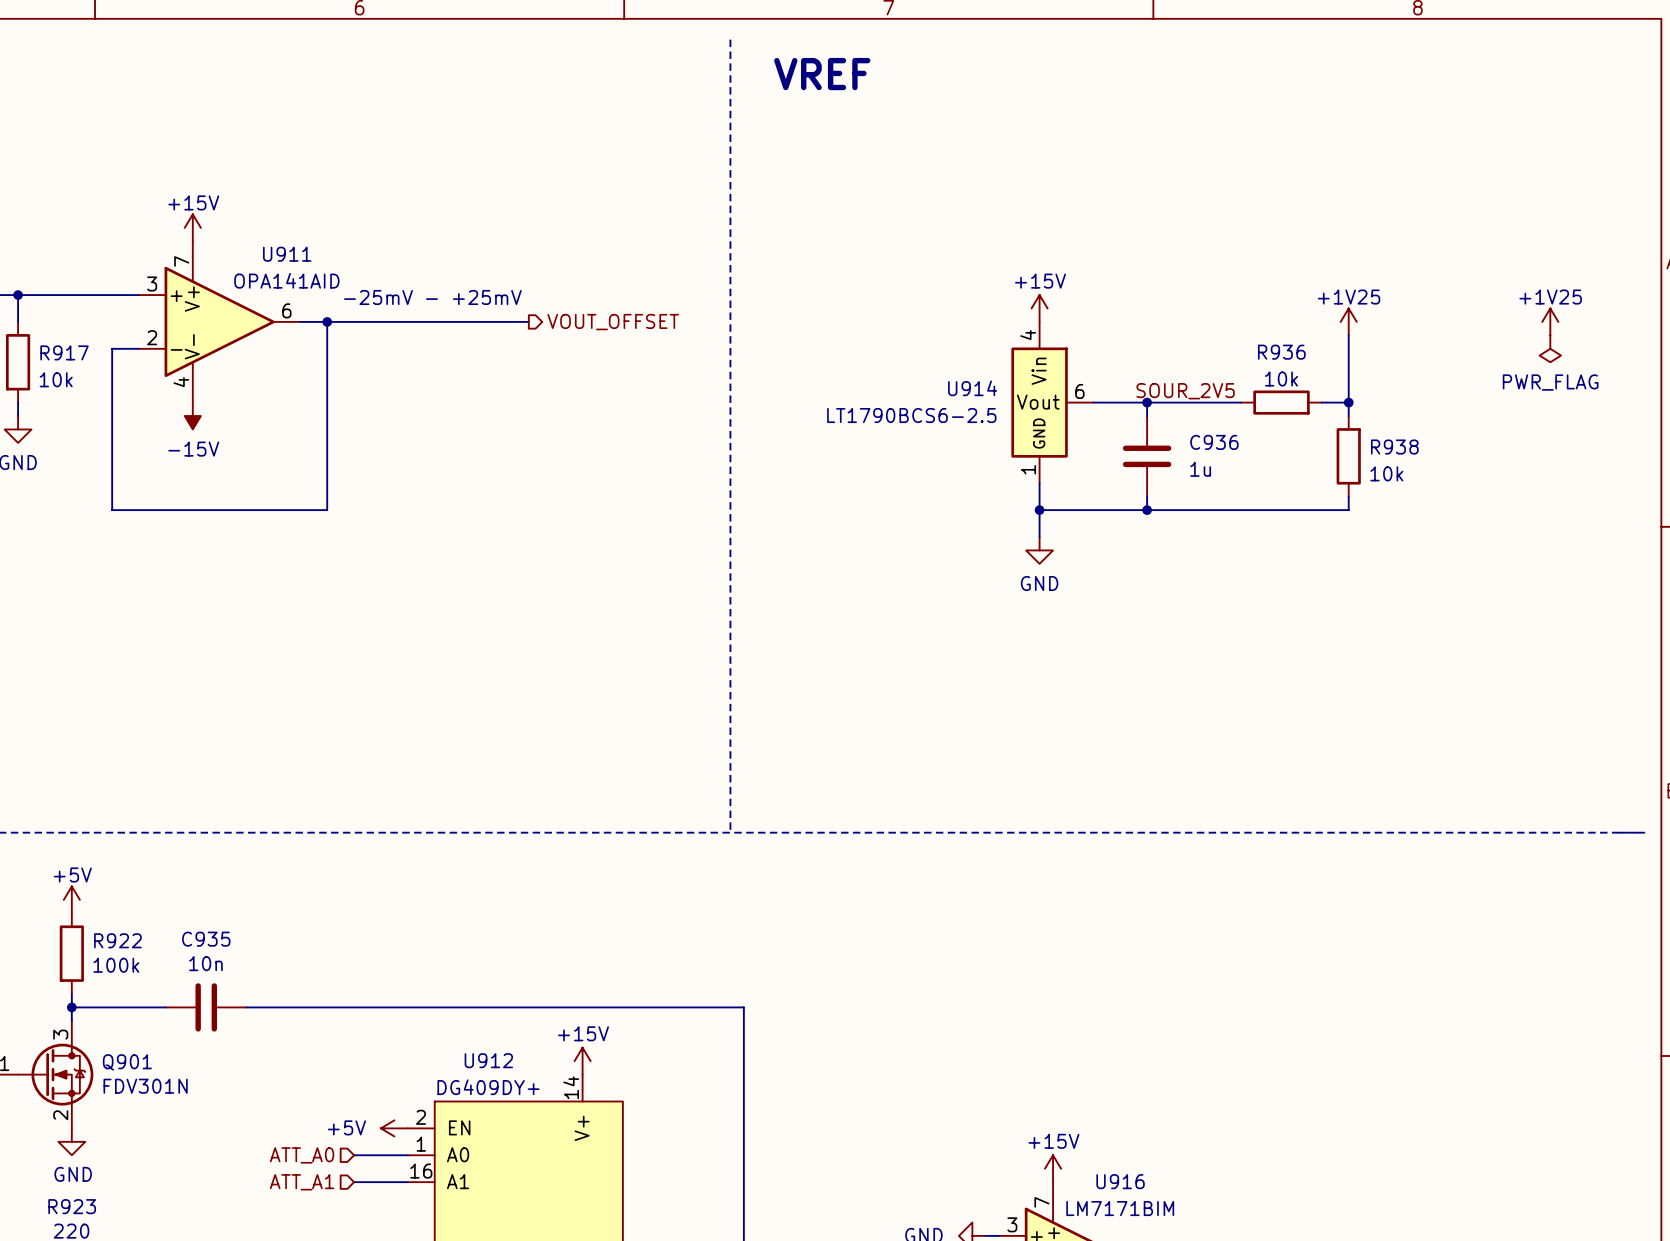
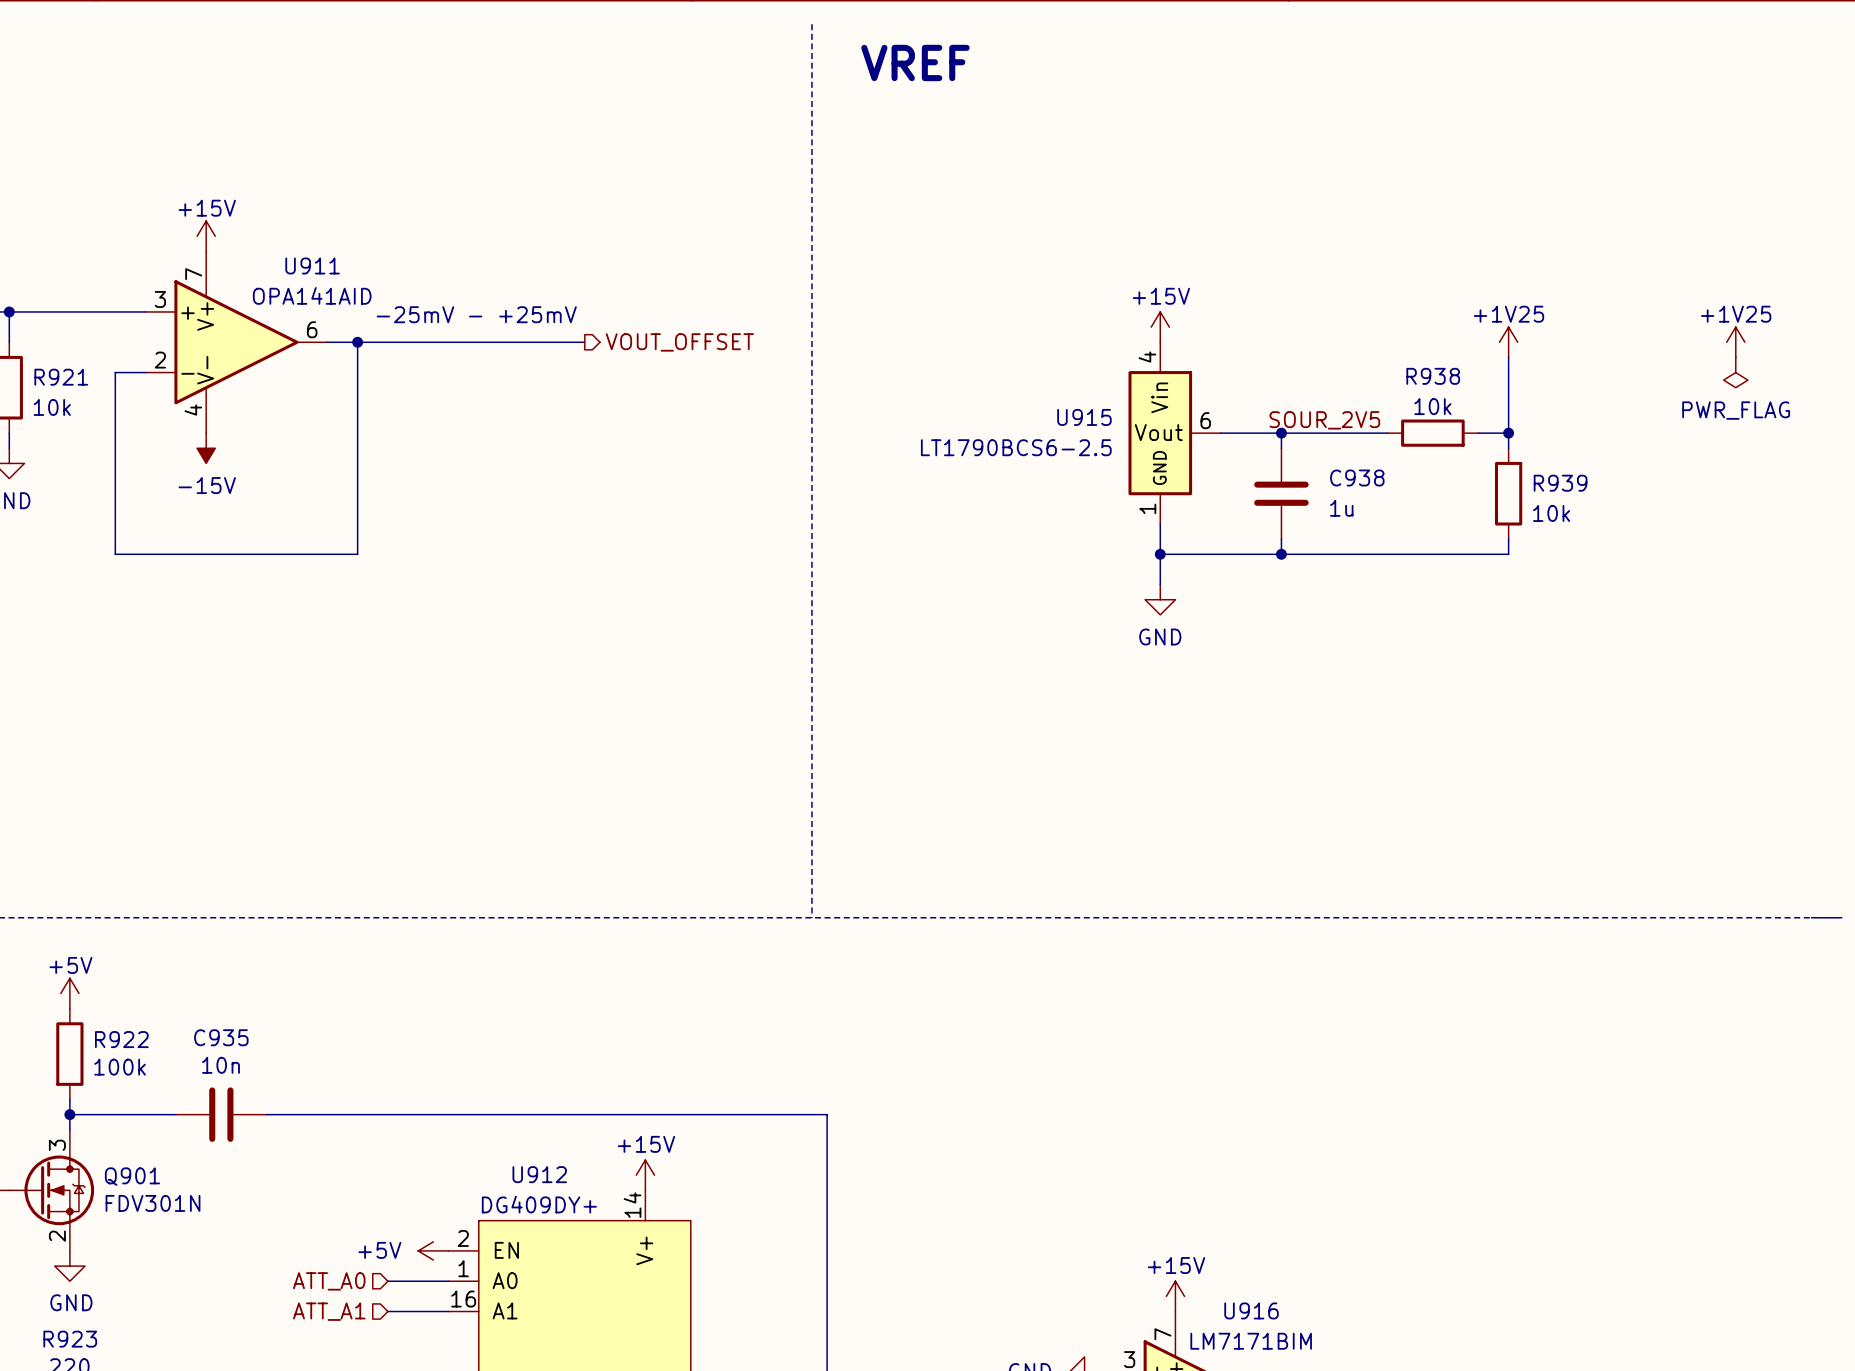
R917 name: R917 (64, 352) -> R921 (61, 377)
R936 name: R936 (1281, 352) -> R938 (1433, 376)
U914 name: U914 (972, 388) -> U915 (1084, 417)
C936 name: C936 (1214, 442) -> C938 (1357, 478)
R938 name: R938 (1394, 447) -> R939 (1560, 483)

